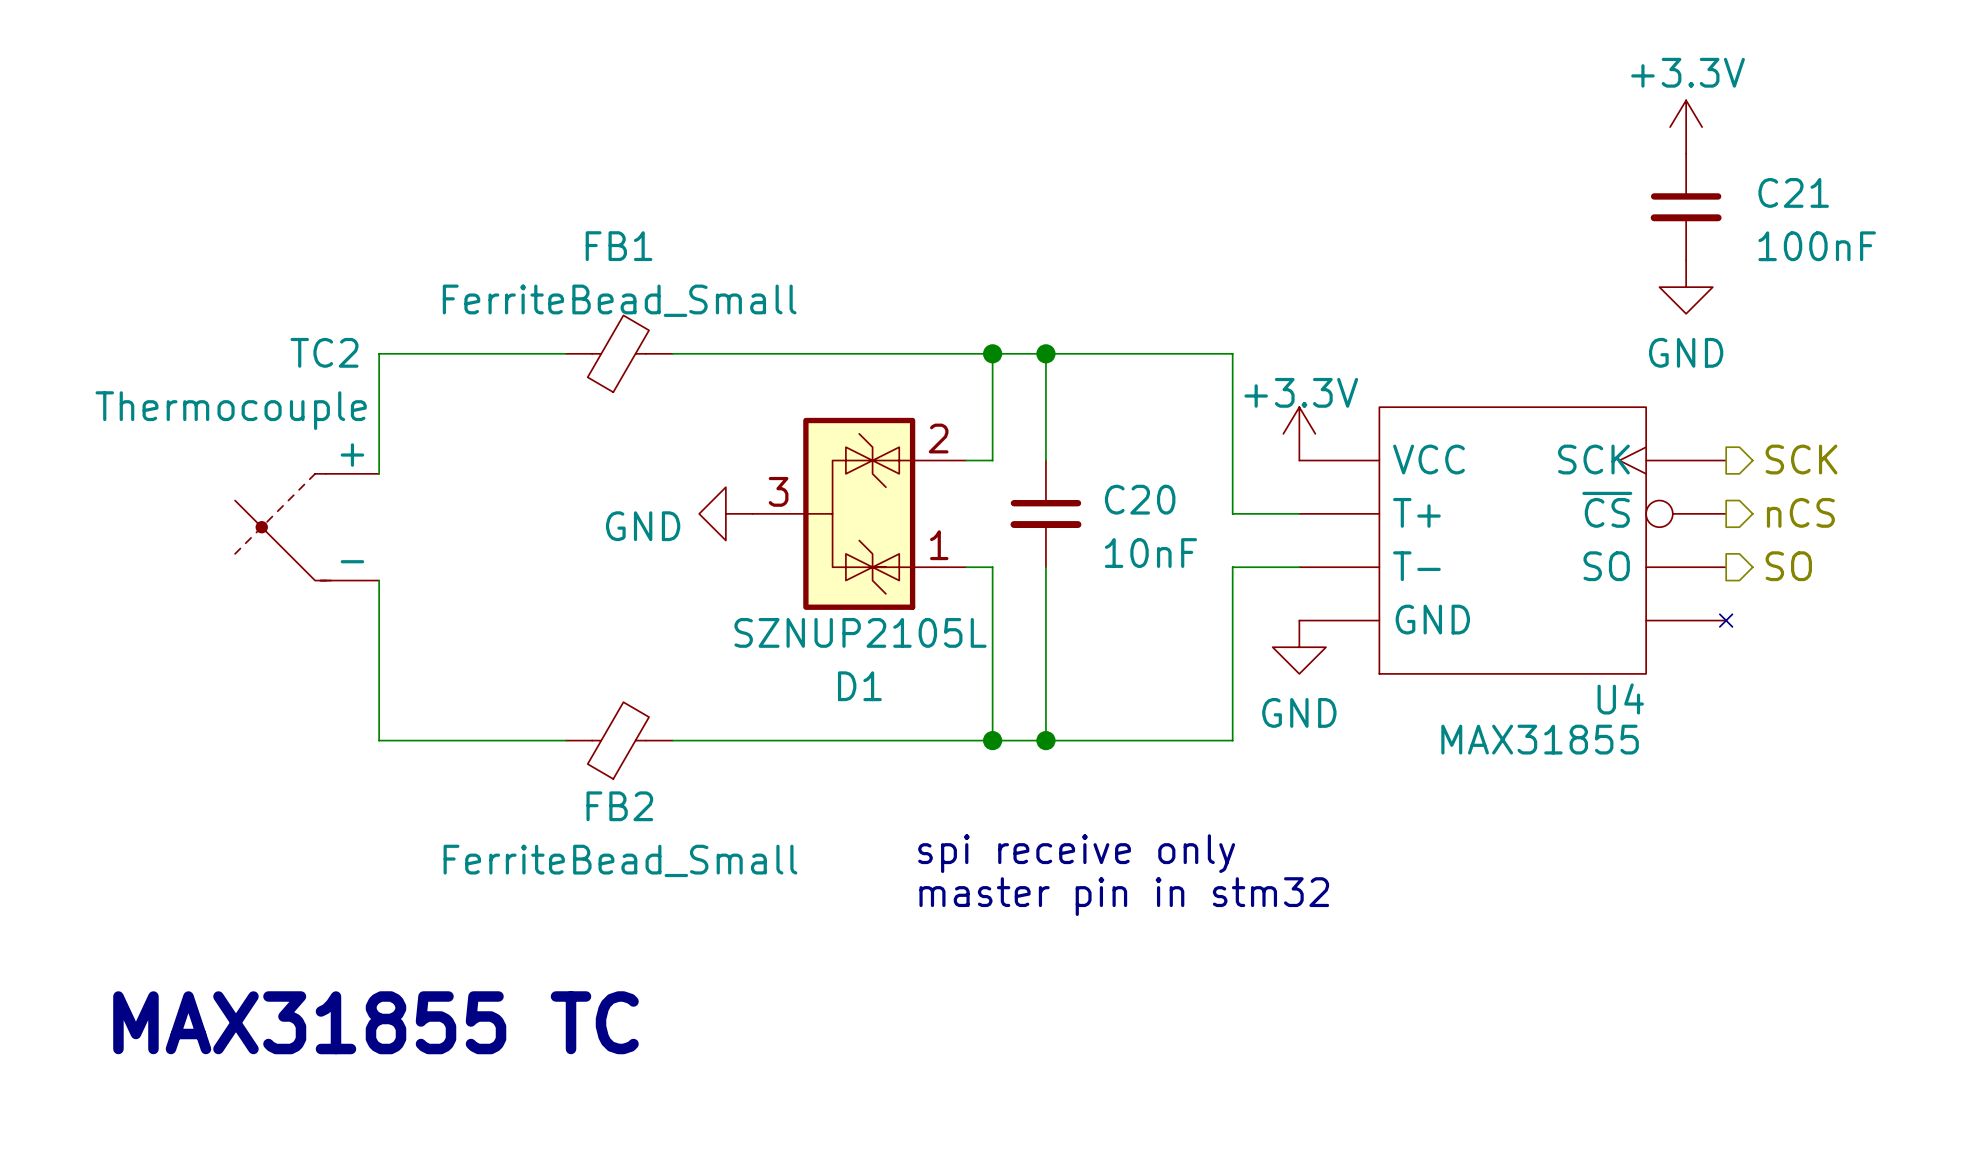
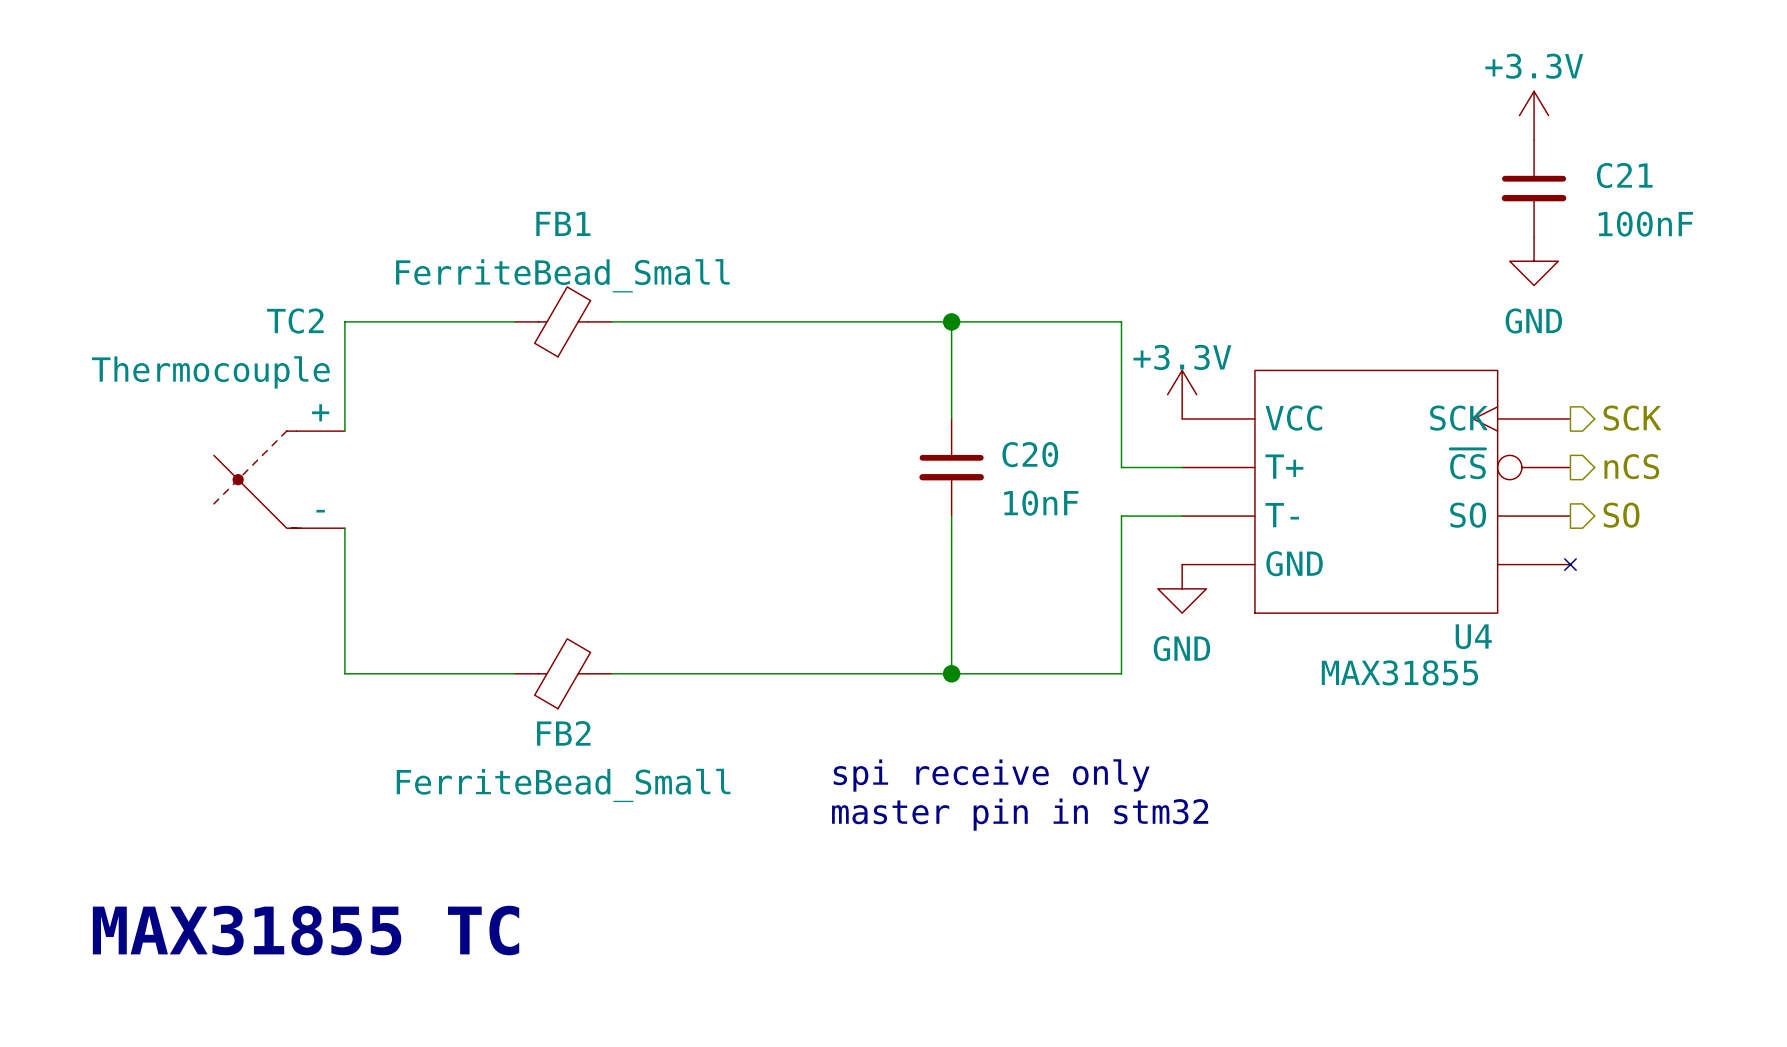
wire: (992, 353) (992, 460) (965, 460) -> none
junction: (992, 353) -> none
power symbol: GND (725, 513) -> none
D1: SZNUP2105L (859, 513) -> none
wire: (965, 567) (992, 567) (992, 740) -> none
junction: (992, 740) -> none

